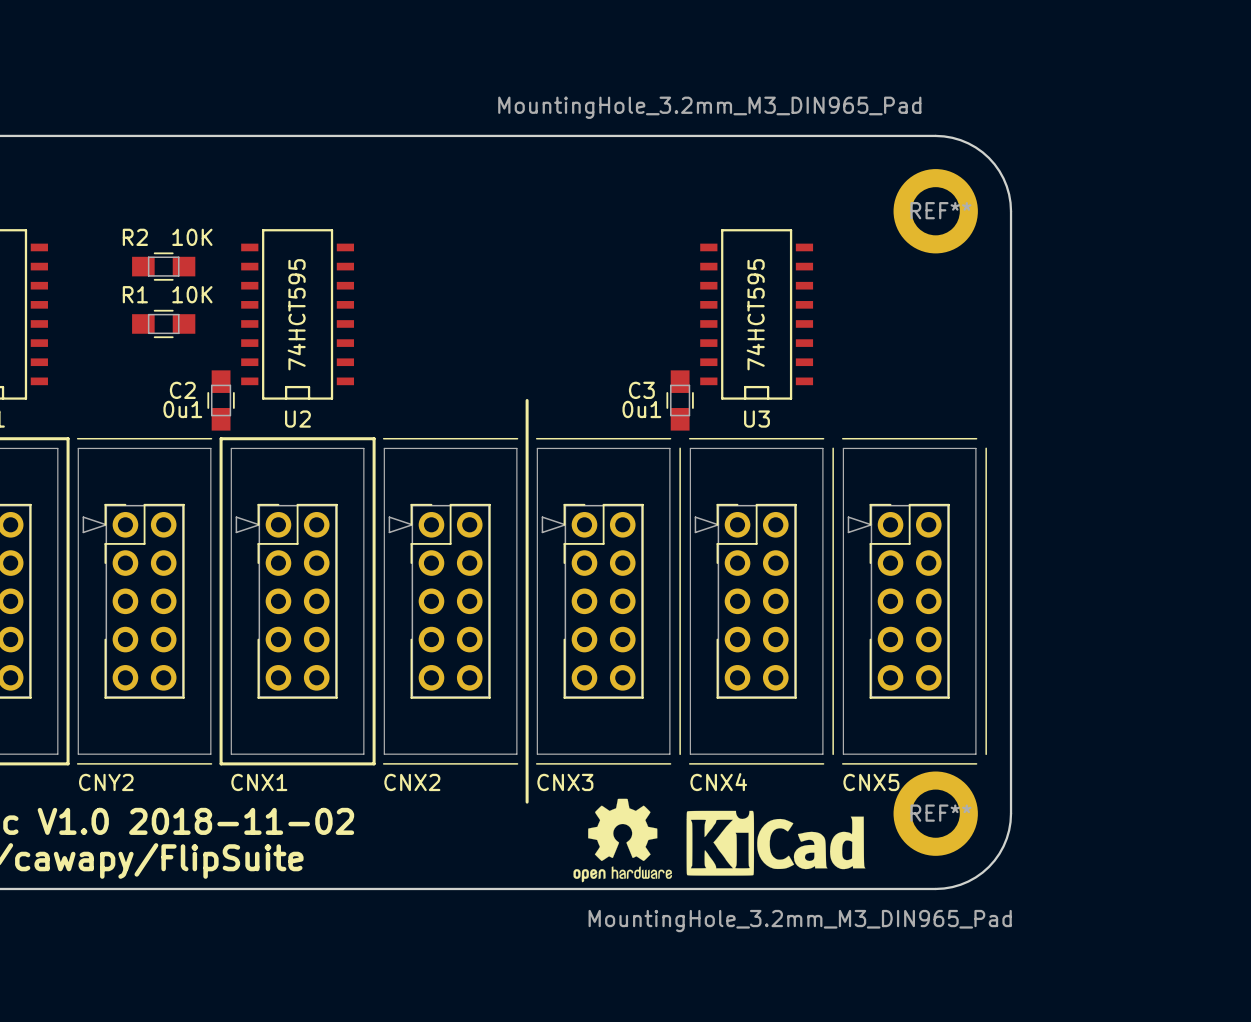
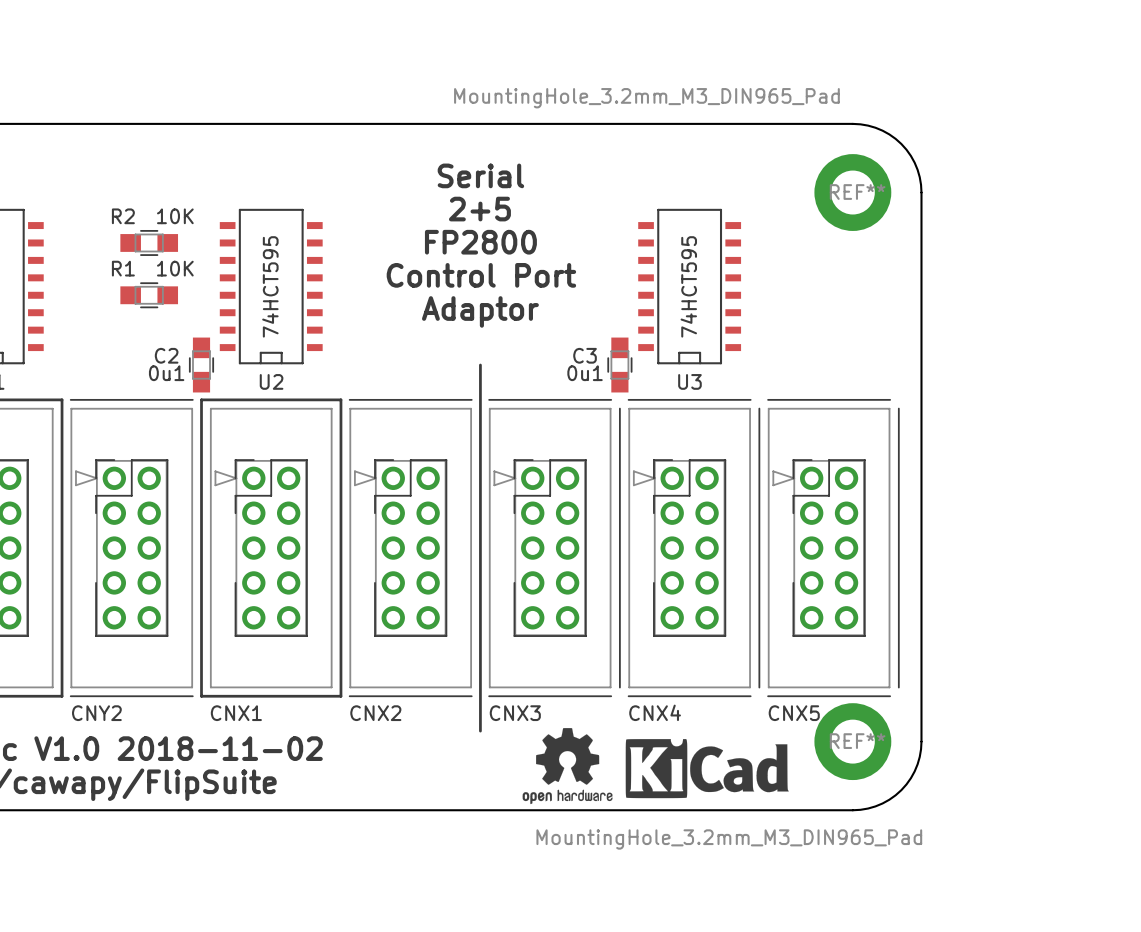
text: none -> Serial (480, 175)
text: none -> 2+5 (479, 209)
text: none -> FP2800 (480, 242)
text: none -> Control Port (481, 275)
text: none -> Adaptor (480, 311)

